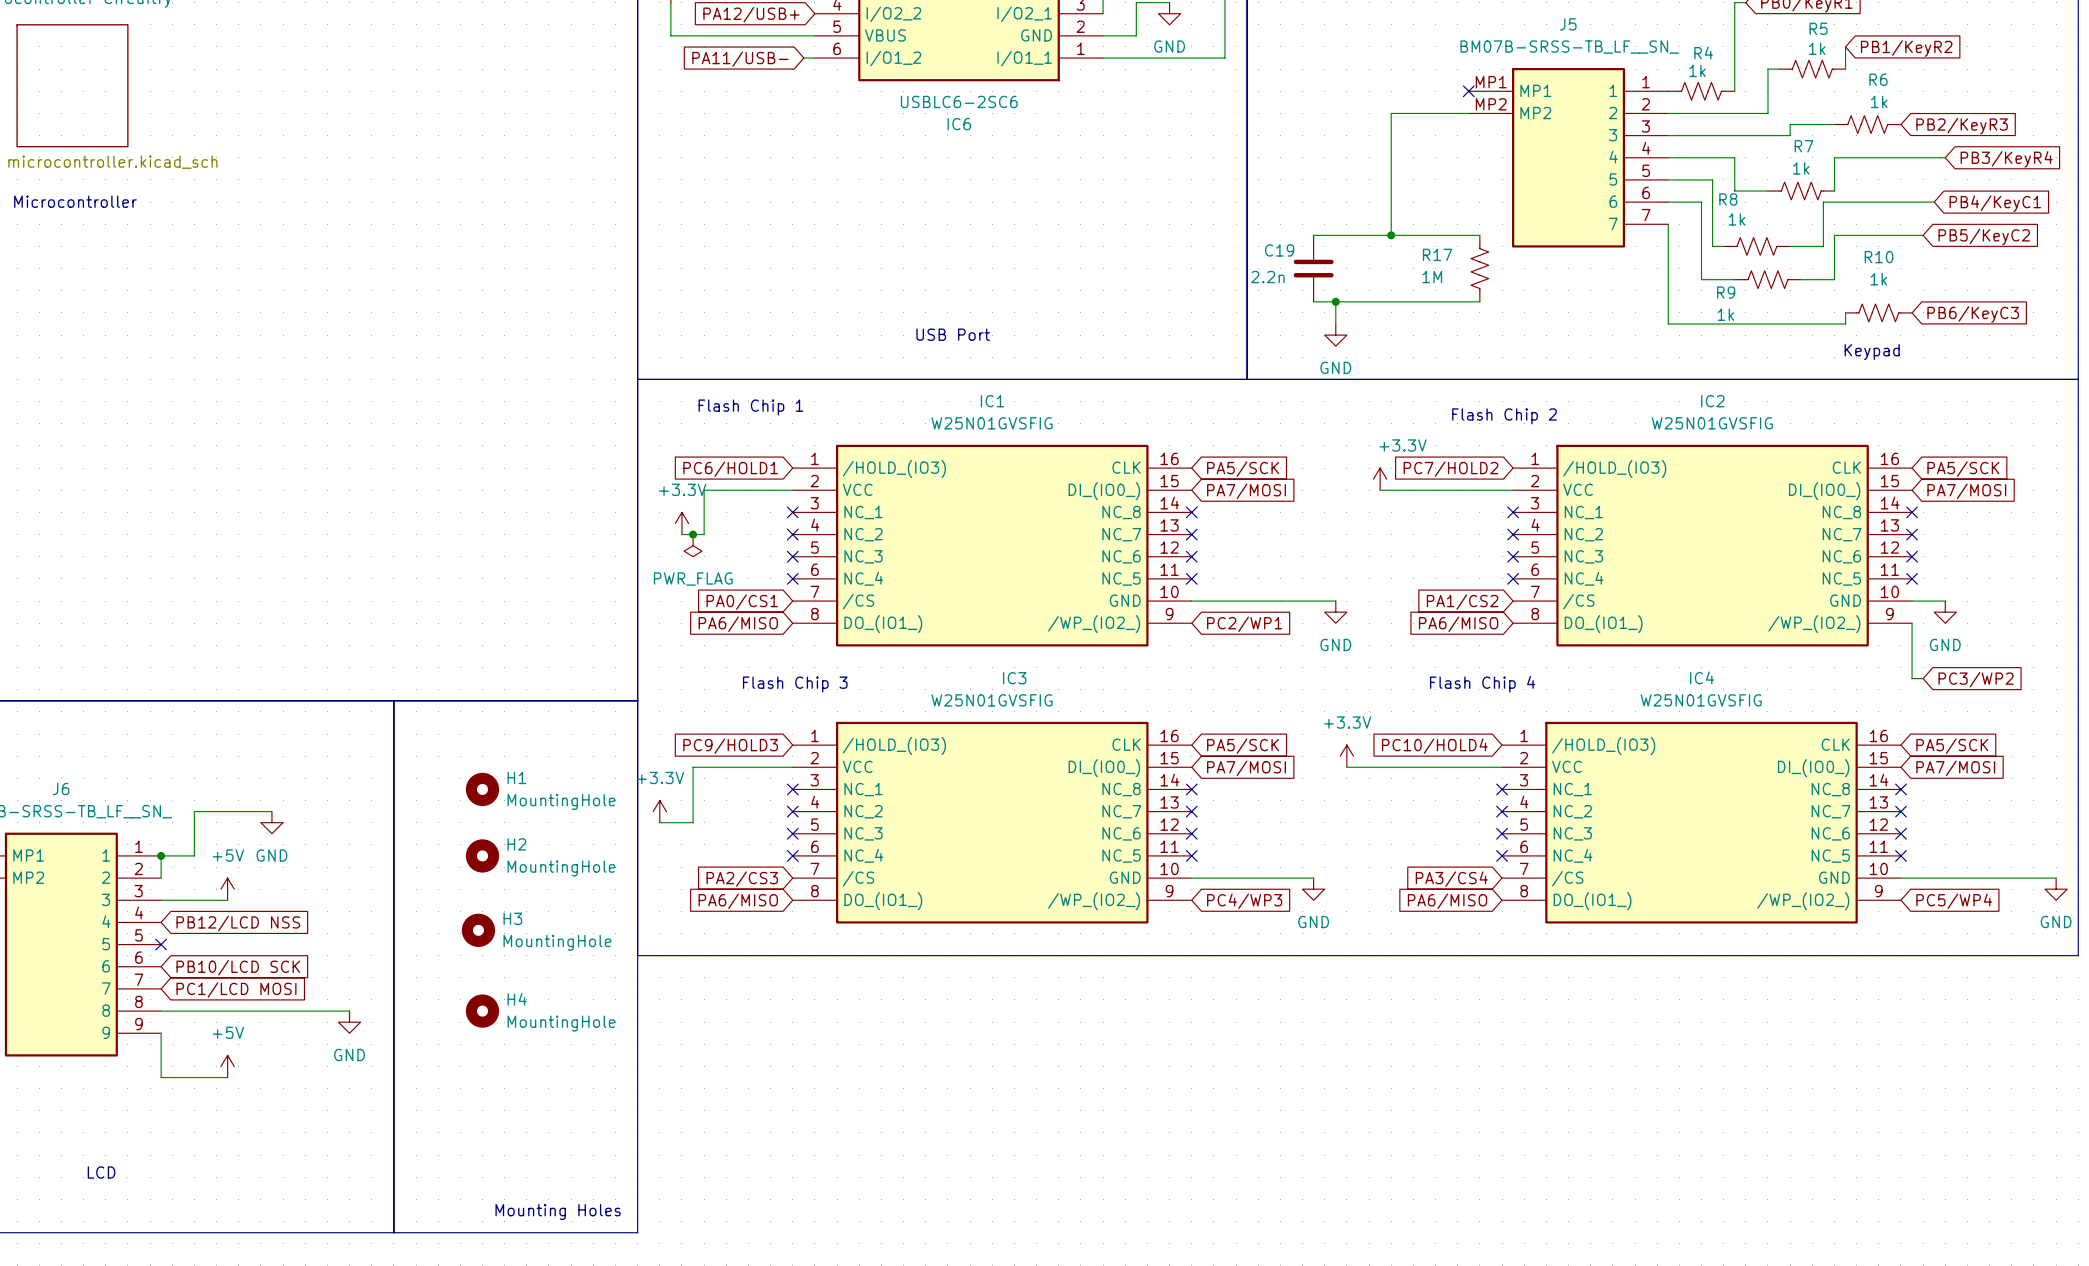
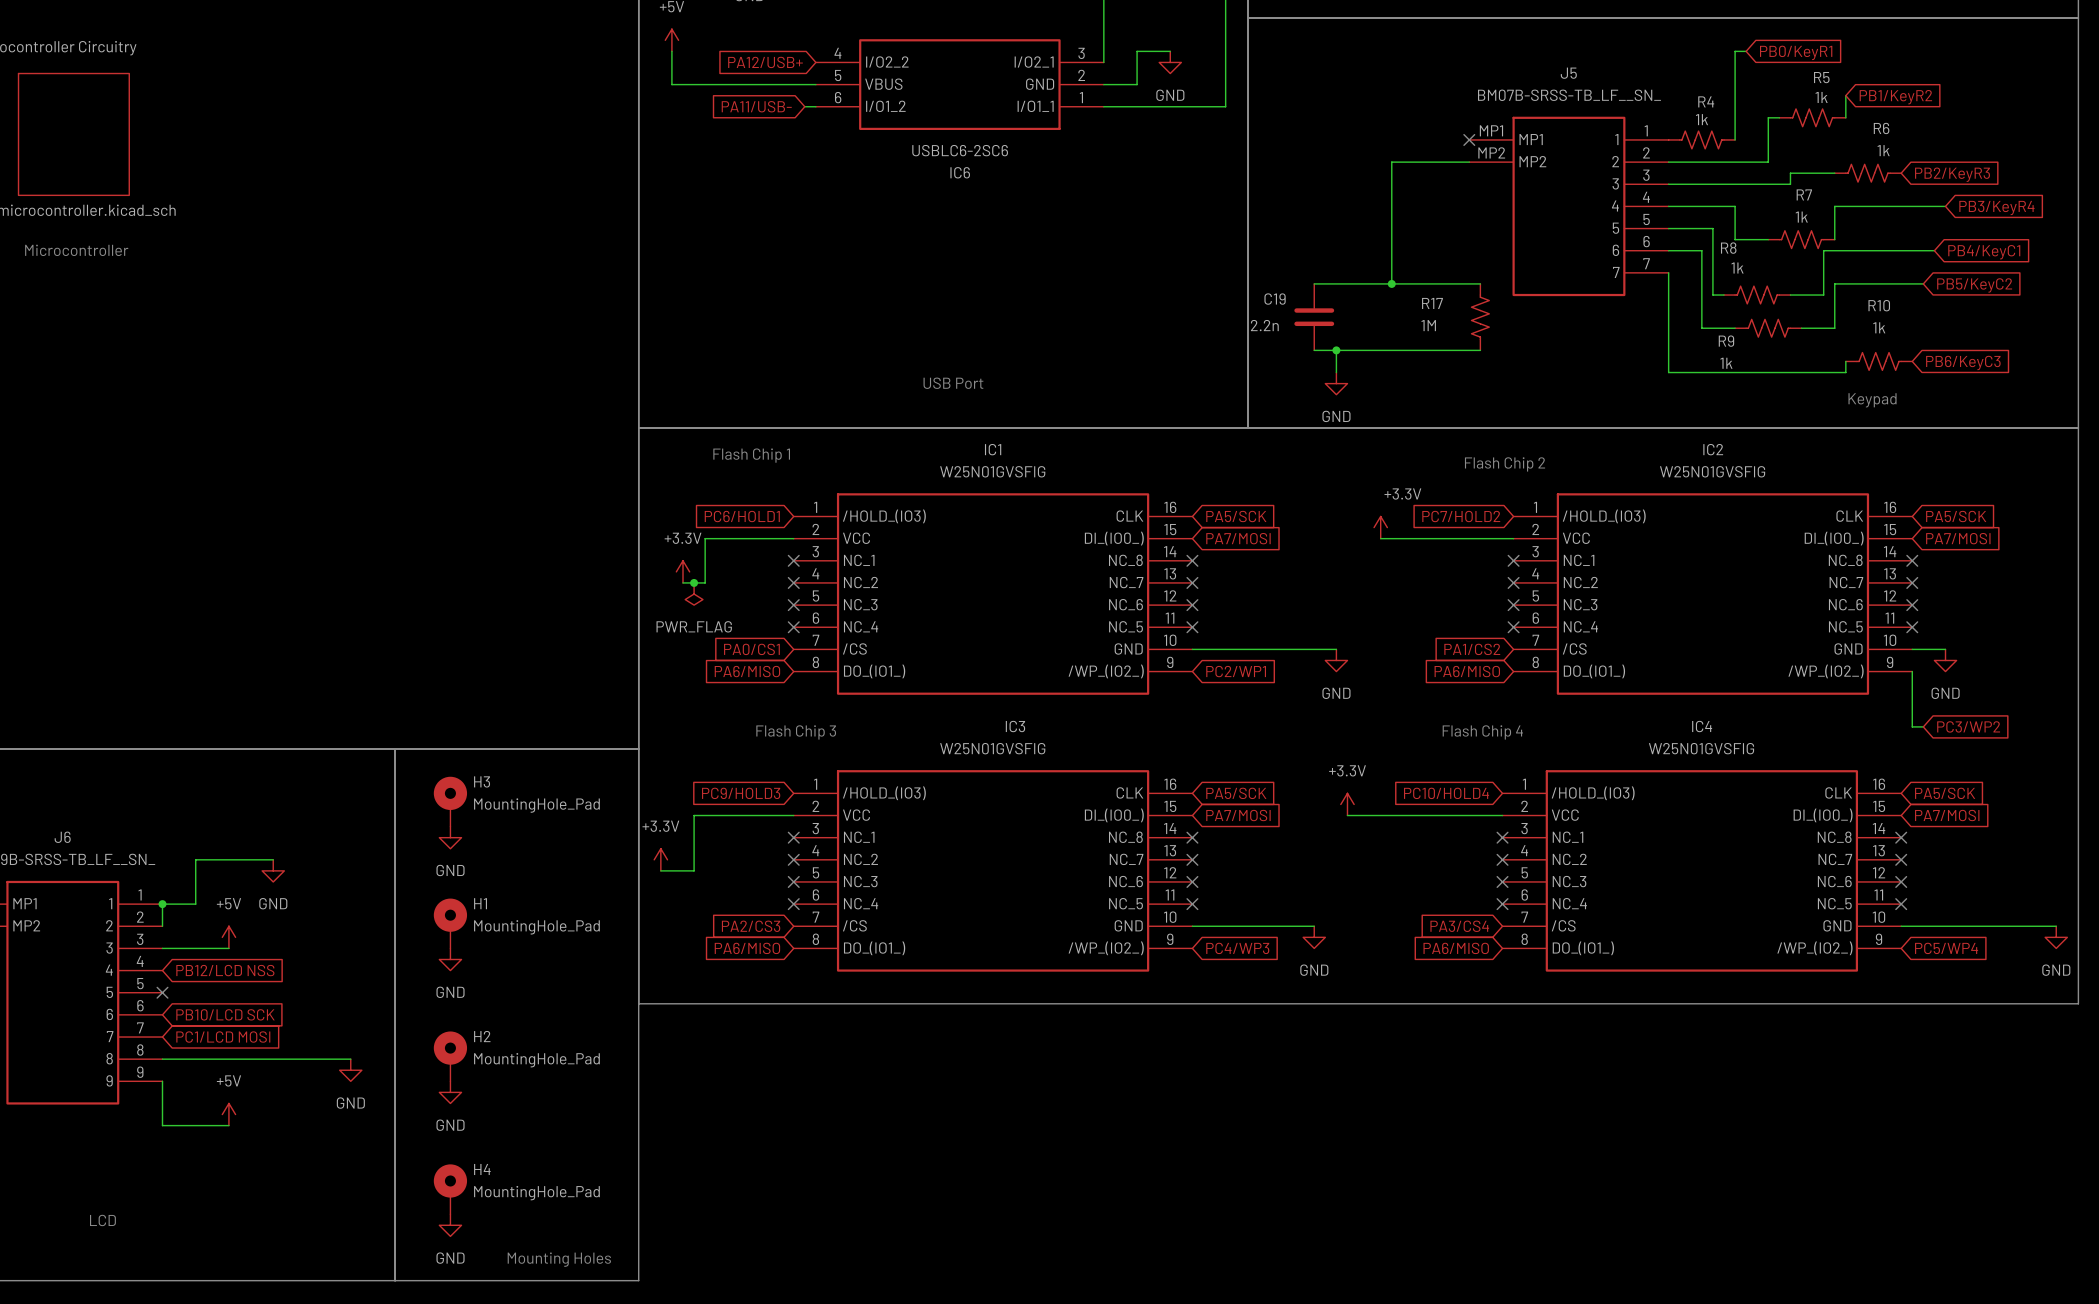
H1 symbol: [465, 772, 500, 807] -> [433, 898, 468, 949]
power symbol: none -> GND (450, 837)
H1 value: MountingHole (561, 801) -> MountingHole_Pad (536, 927)
H2 symbol: [465, 839, 500, 873] -> [433, 1031, 468, 1082]
H2 value: MountingHole (561, 868) -> MountingHole_Pad (536, 1060)
power symbol: none -> GND (450, 959)
H3 symbol: [461, 913, 496, 947] -> [433, 776, 468, 827]
H3 value: MountingHole (557, 942) -> MountingHole_Pad (536, 805)
H4 symbol: [465, 994, 500, 1028] -> [433, 1164, 468, 1215]
H4 value: MountingHole (561, 1023) -> MountingHole_Pad (536, 1193)
power symbol: none -> GND (450, 1092)
power symbol: none -> GND (450, 1225)

